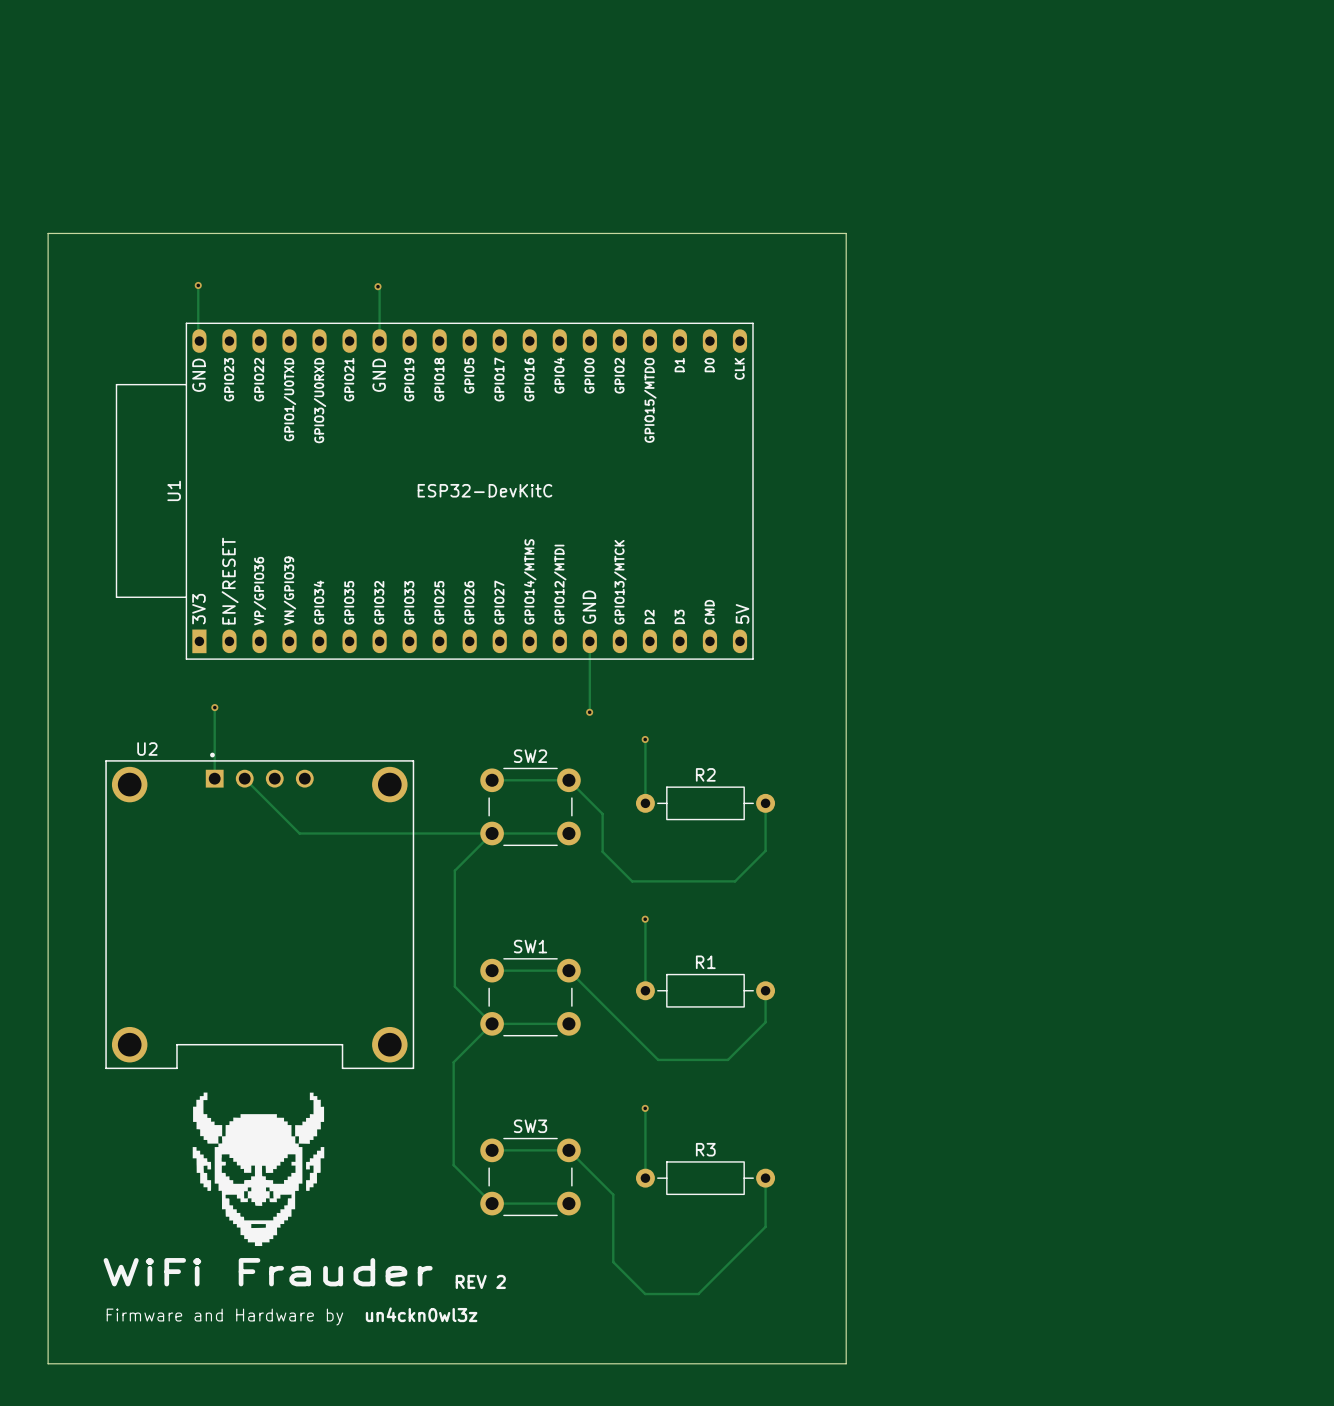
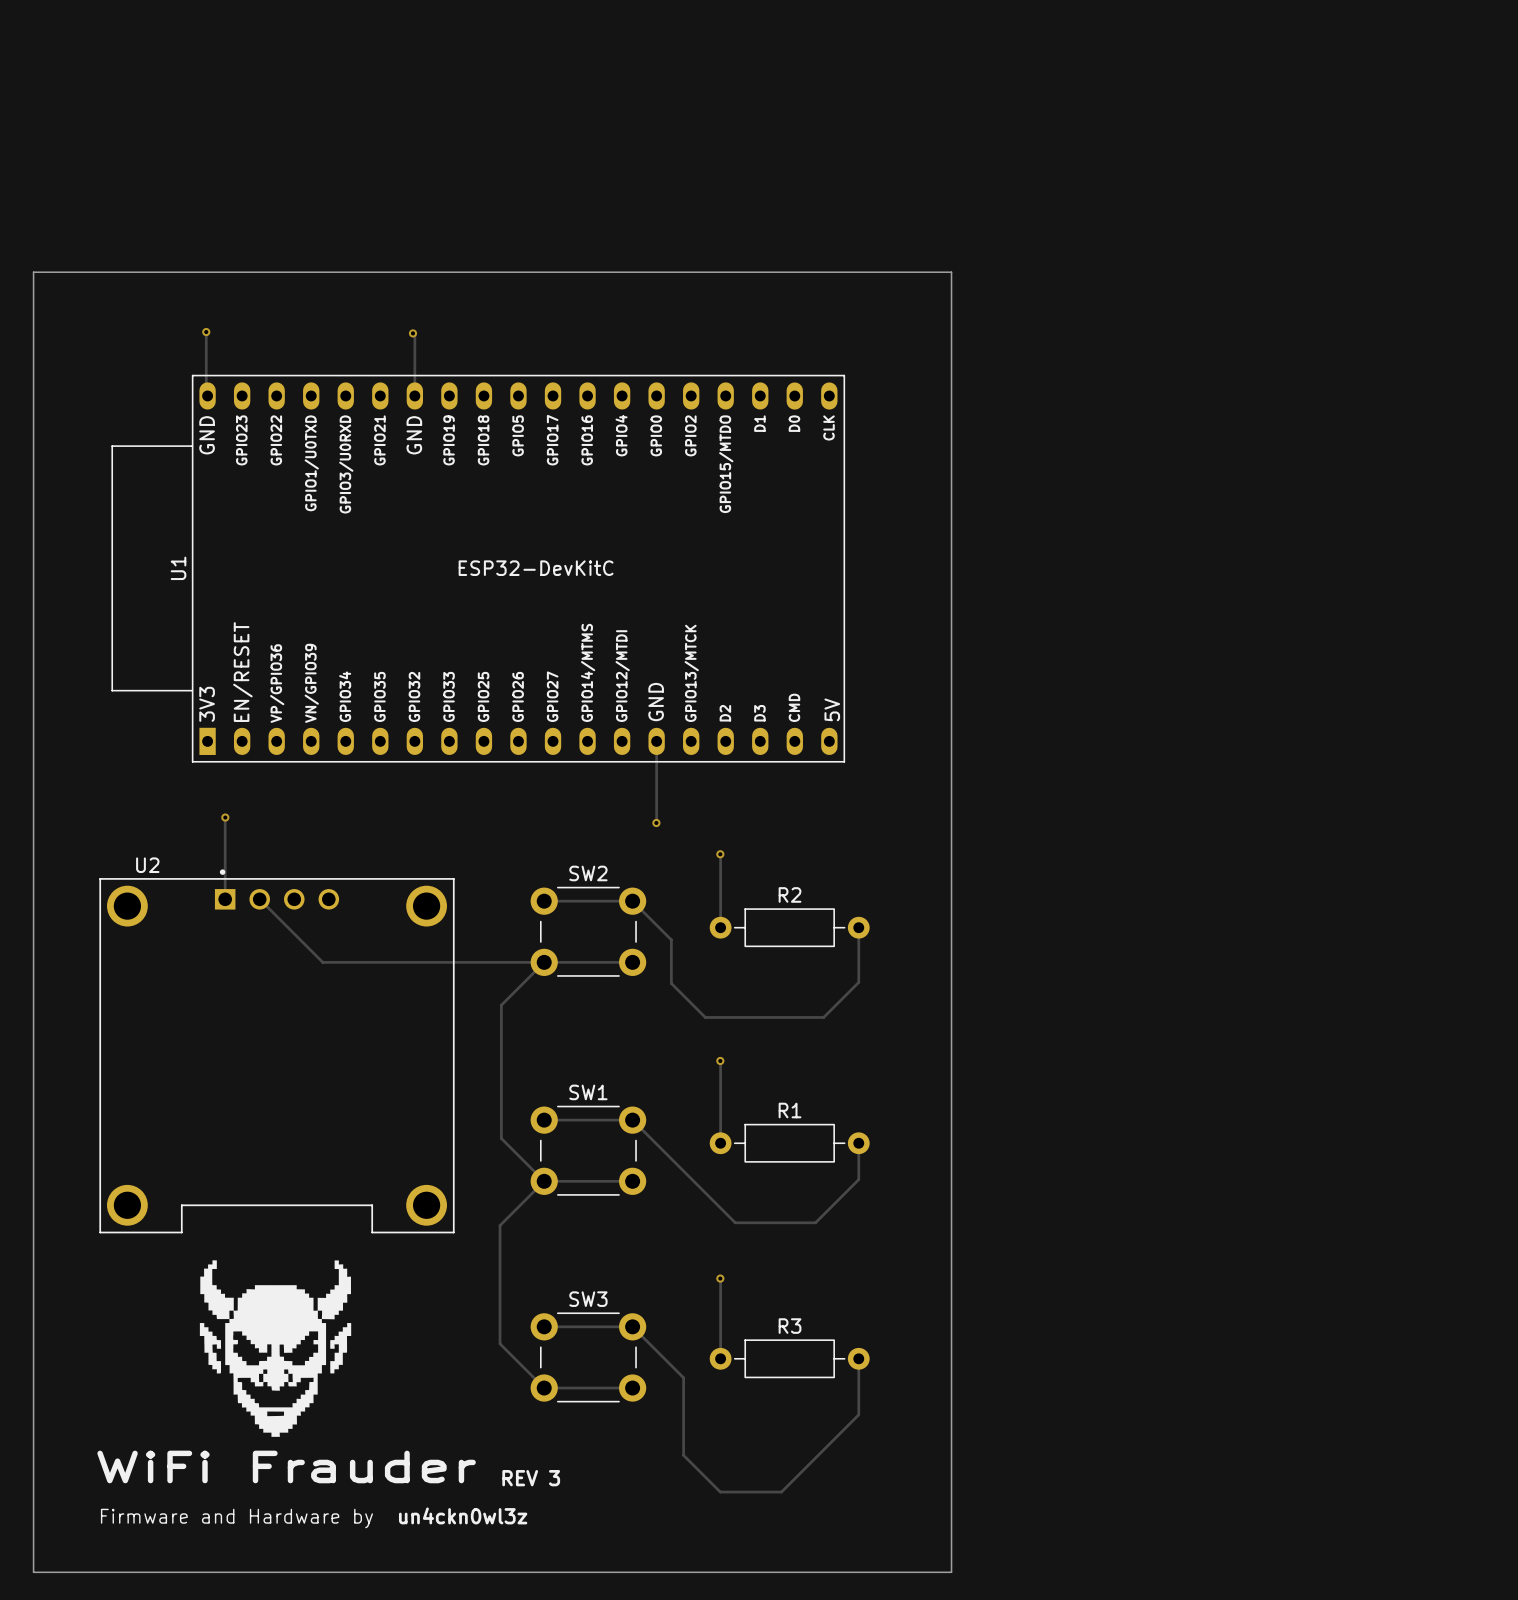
text: REV 2 (480, 1281) -> REV 3 (531, 1478)

